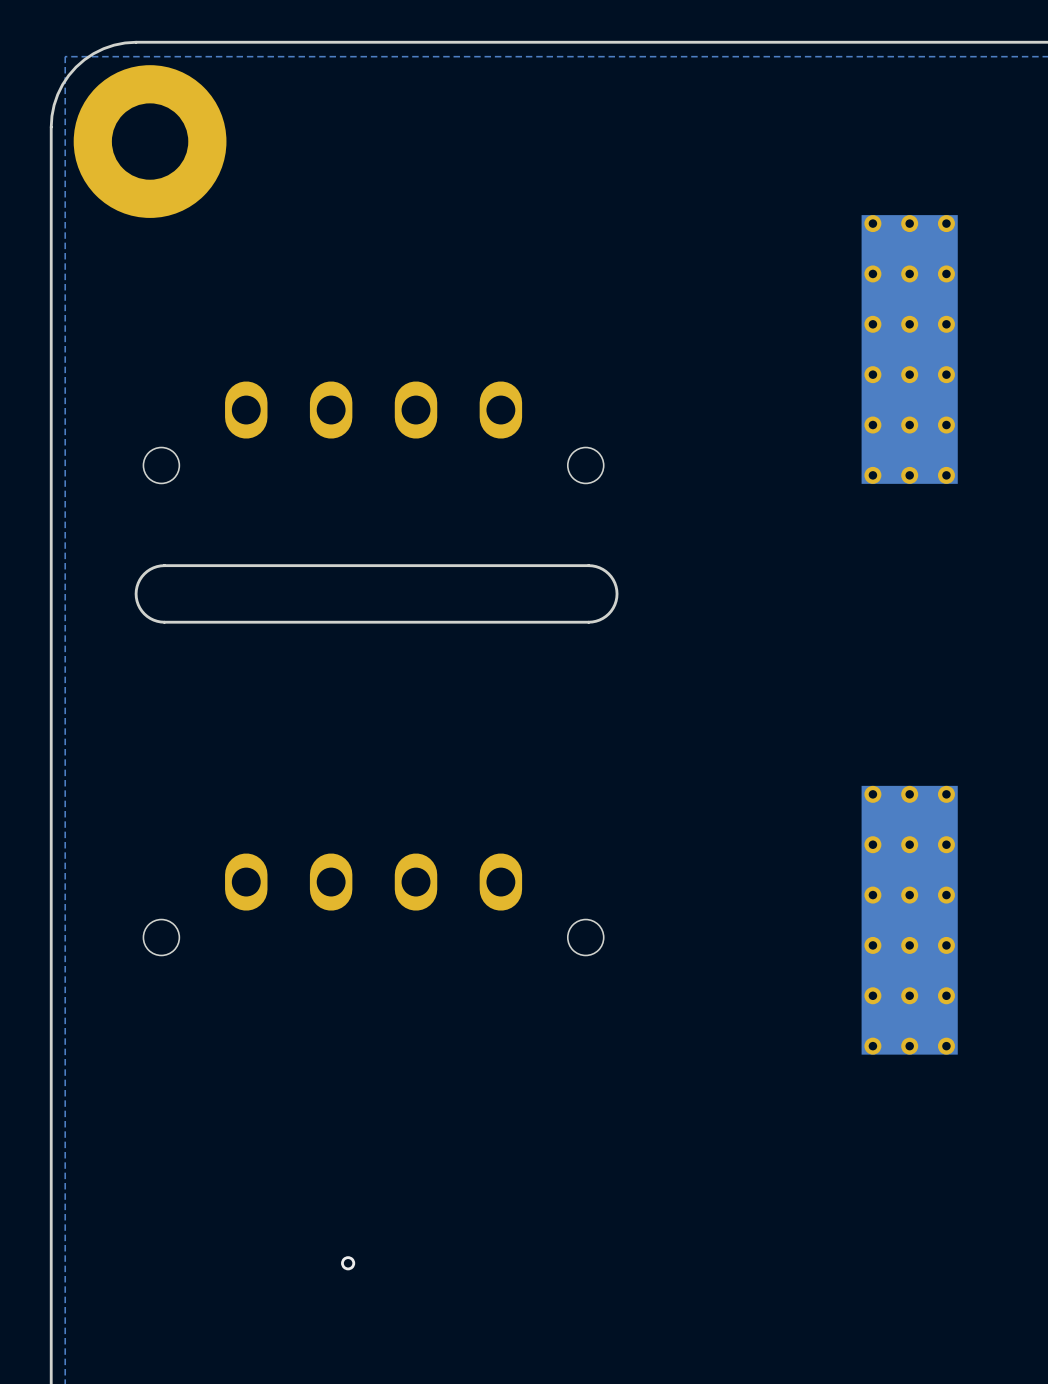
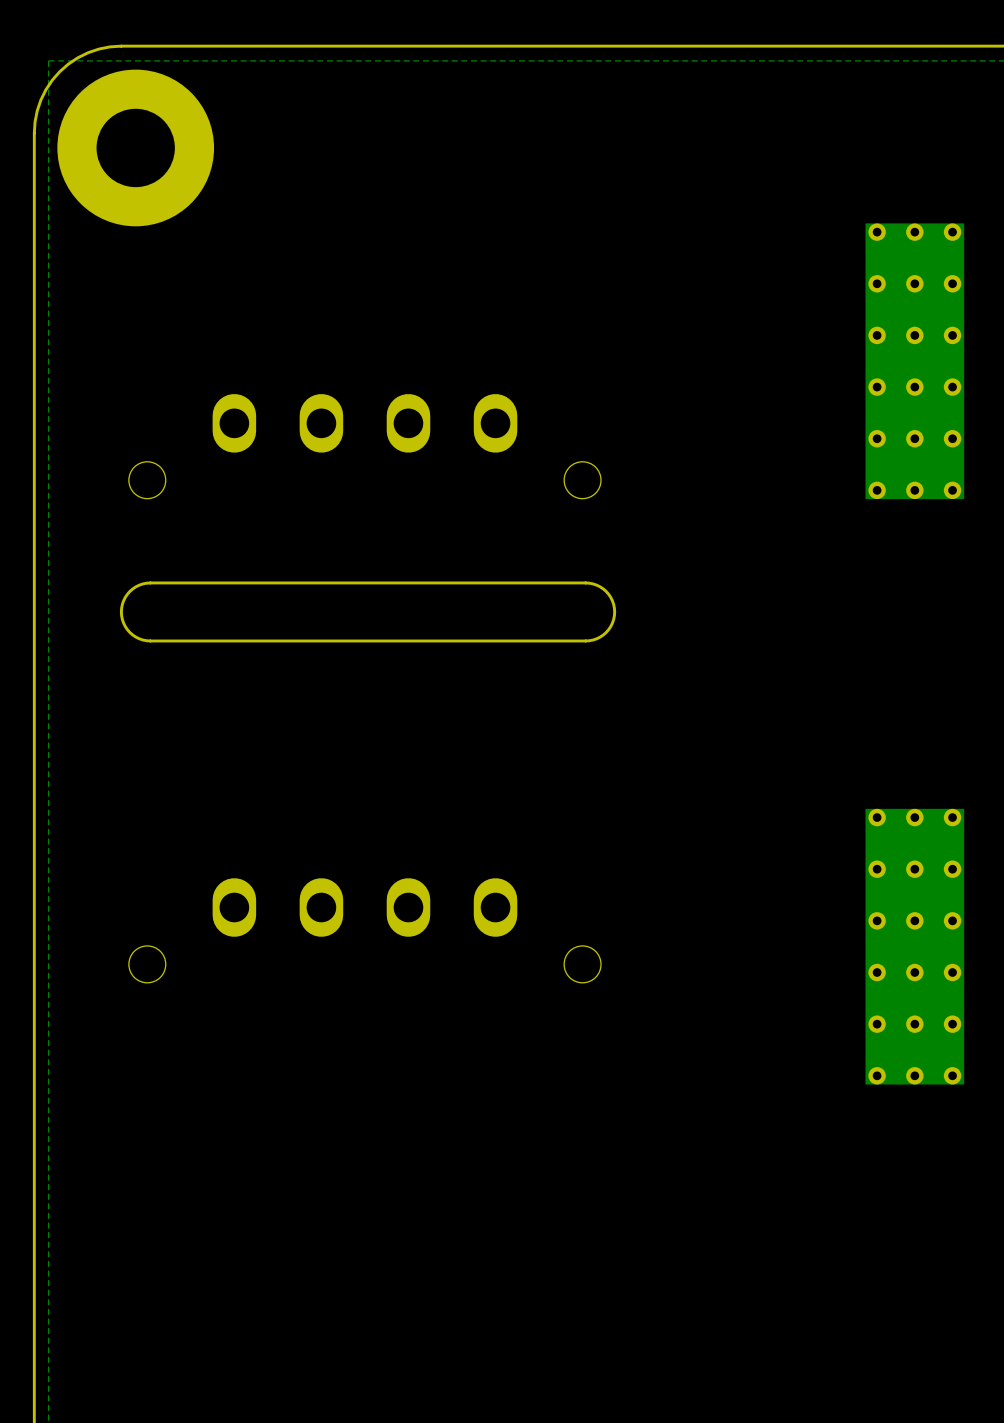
via: (348, 1263) -> none

